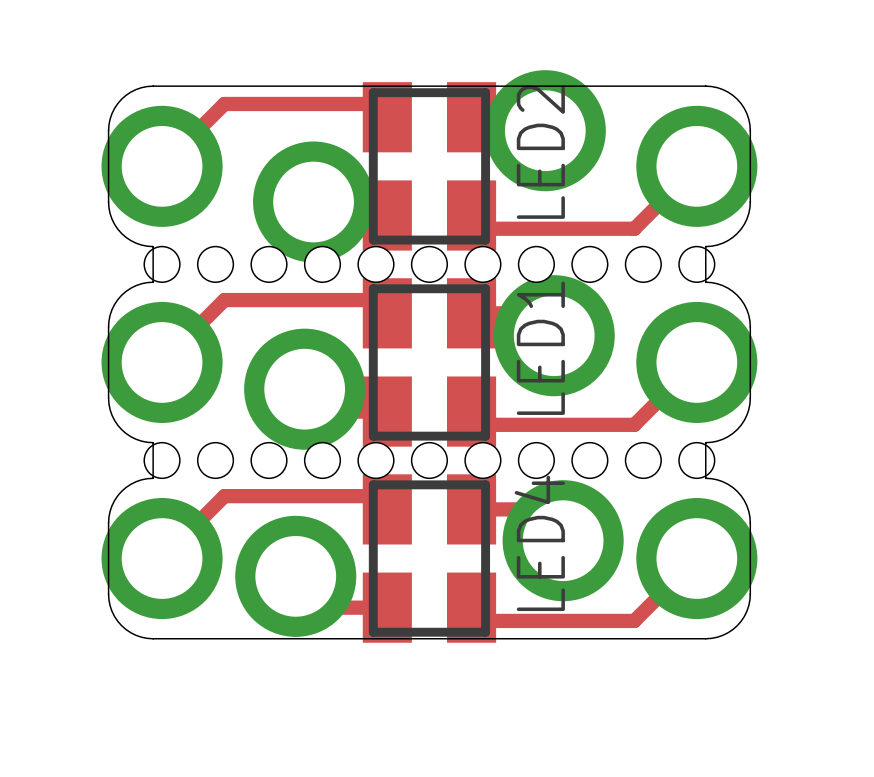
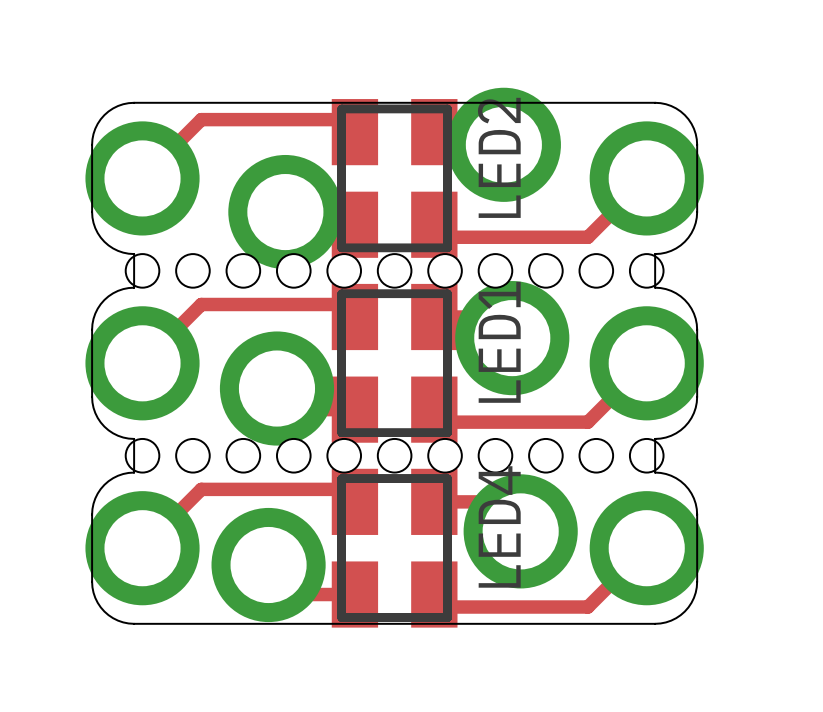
line: none -> (341, 108) (341, 247) (447, 247) (447, 108) (341, 108)
line: none -> (341, 293) (341, 432) (447, 432) (447, 293) (341, 293)
line: none -> (341, 478) (341, 617) (447, 617) (447, 478) (341, 478)

